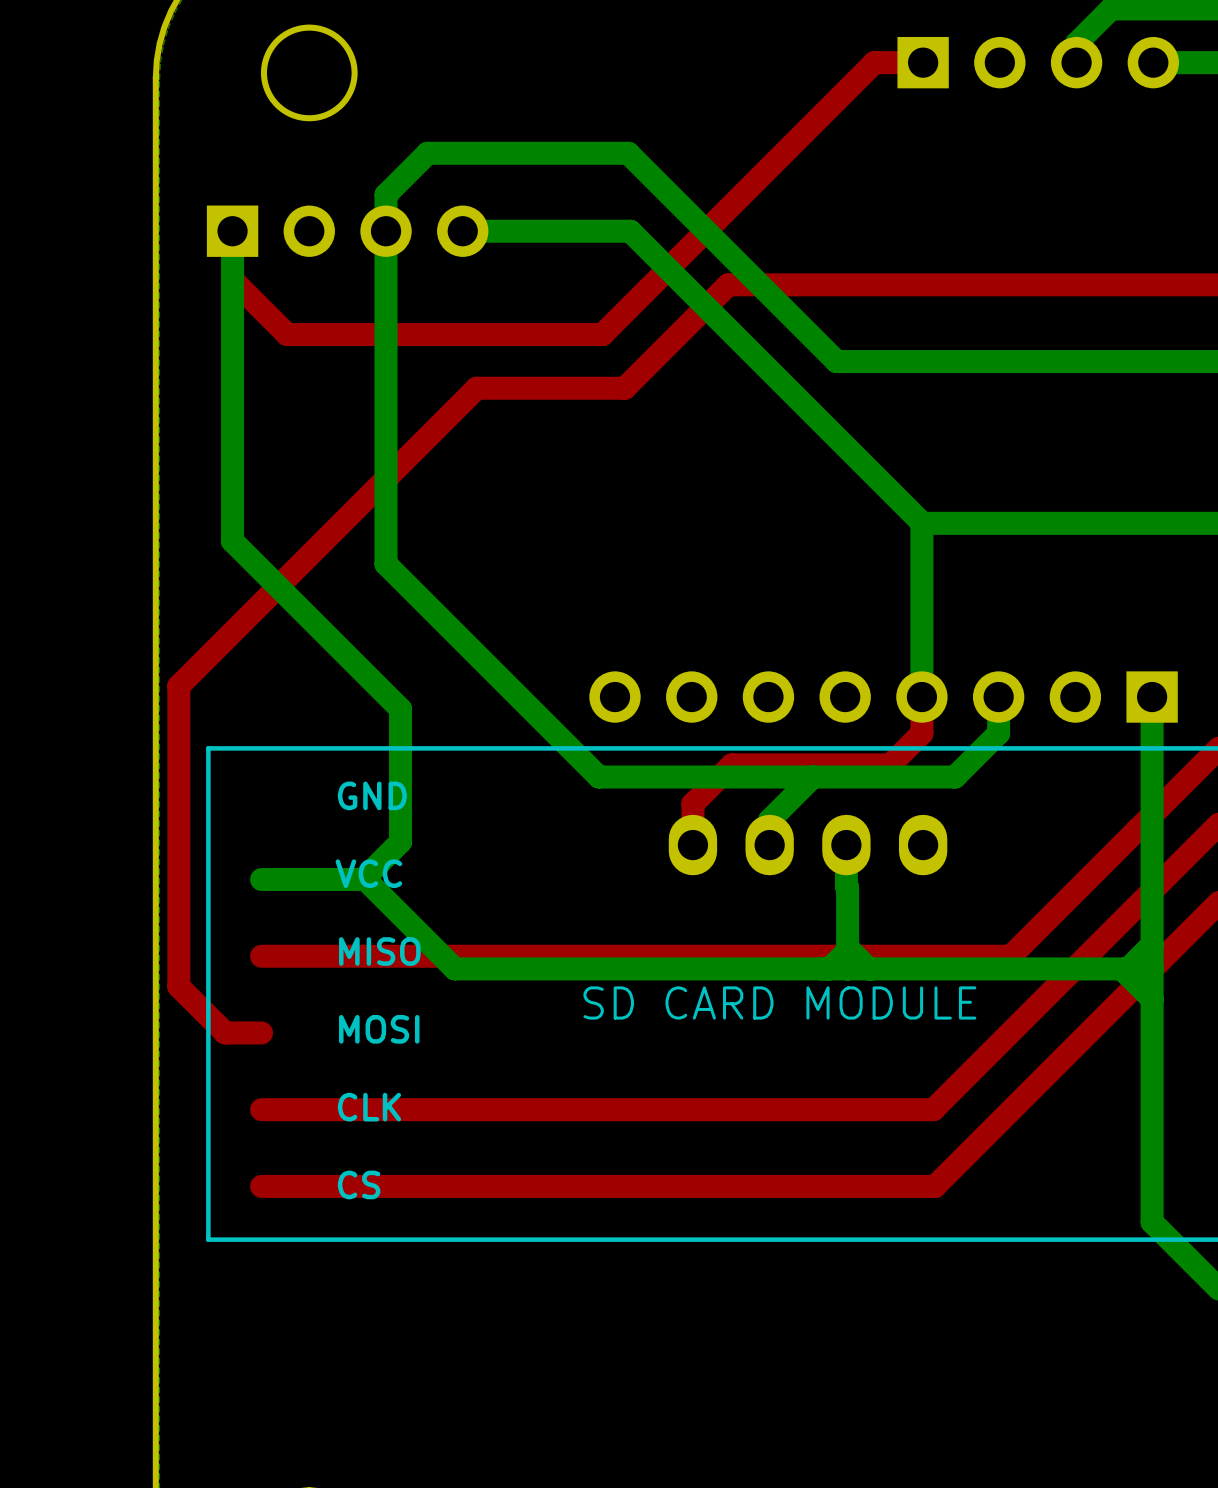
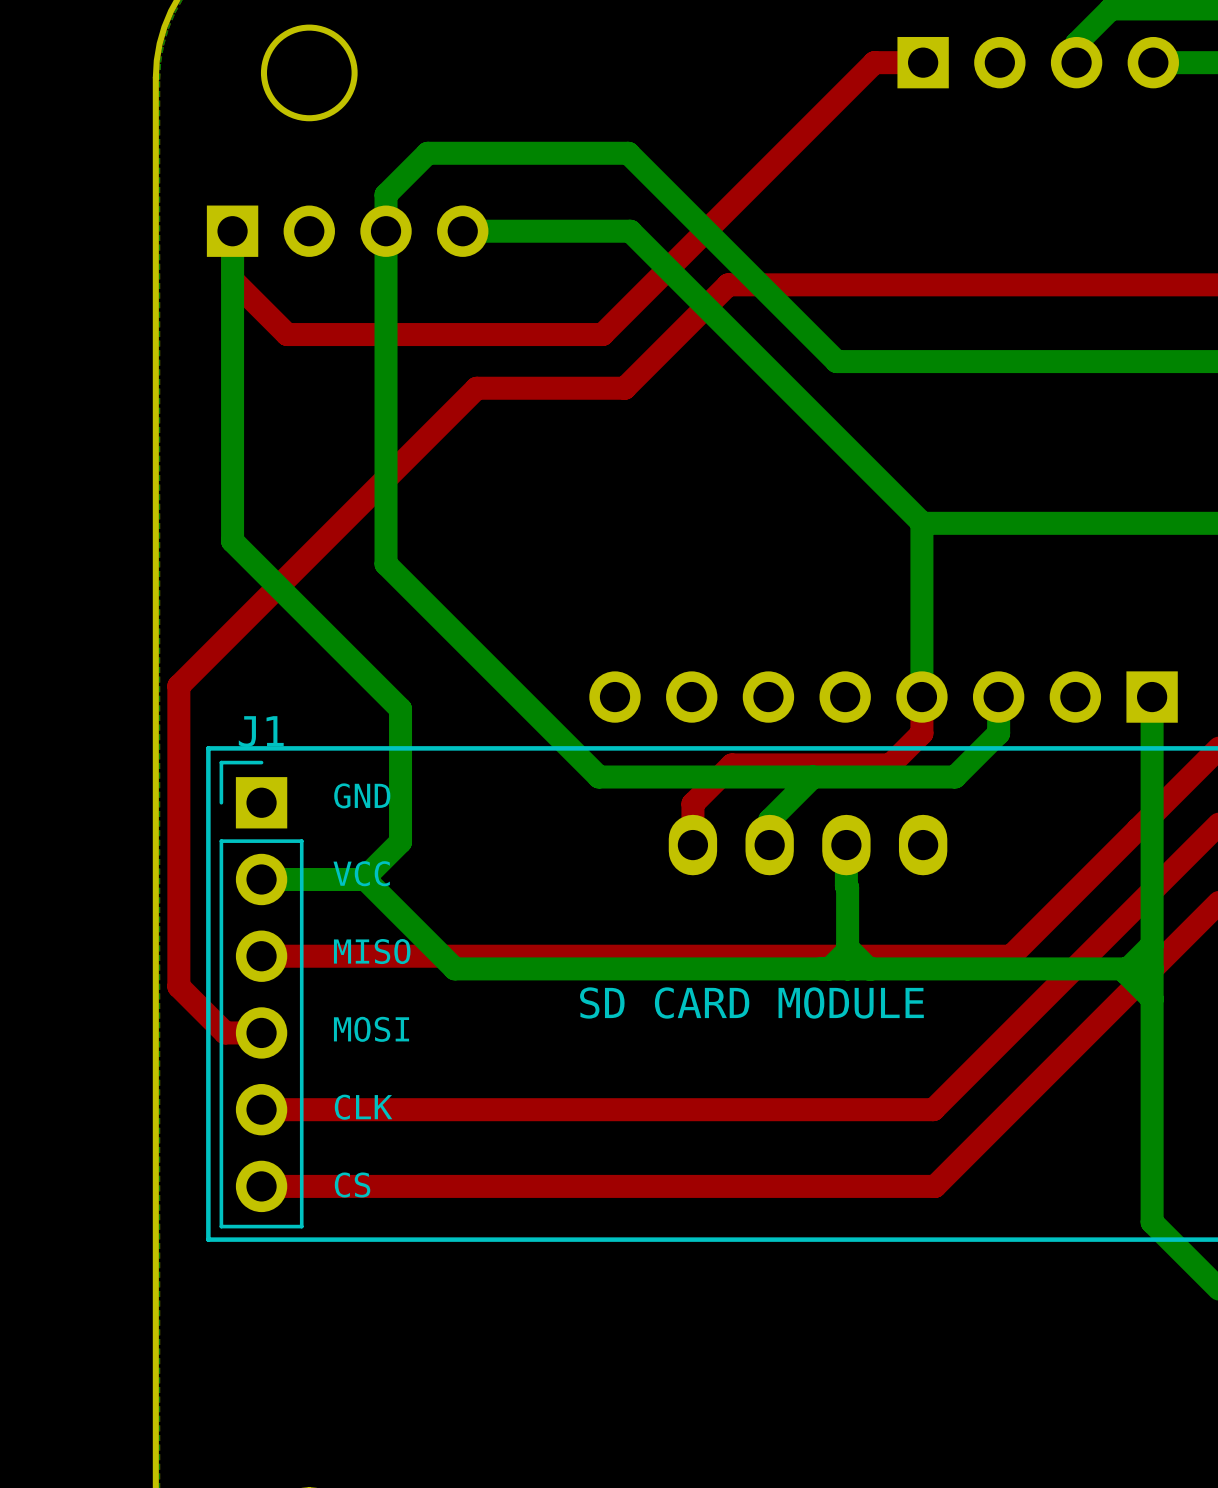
J1: none -> (261, 994)

